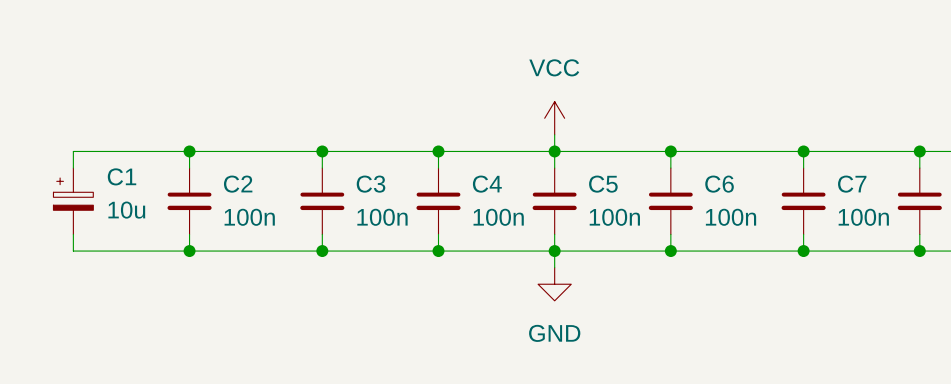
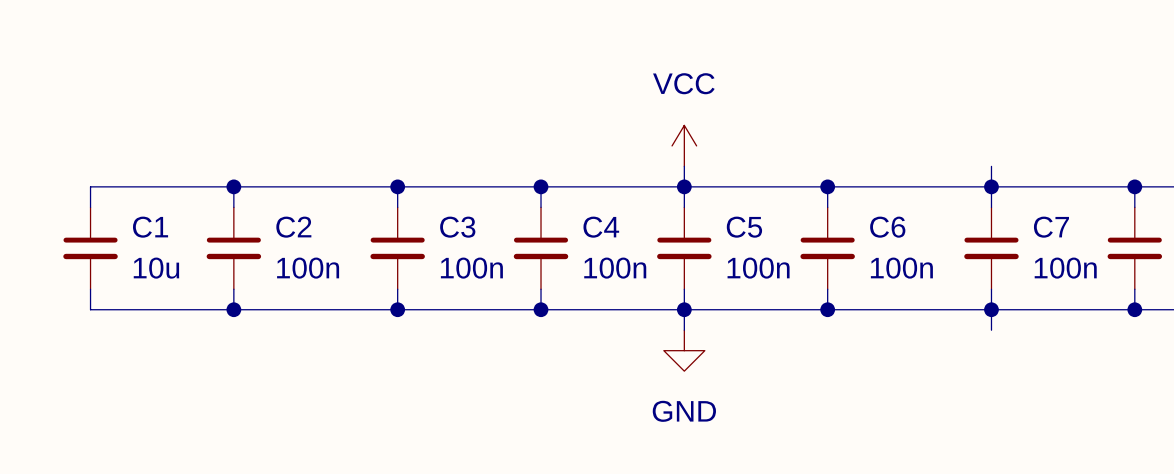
wire: none -> (991, 166) (991, 186)
C1 symbol: [53, 168, 94, 235] -> [63, 207, 118, 290]
wire: none -> (991, 309) (991, 330)

